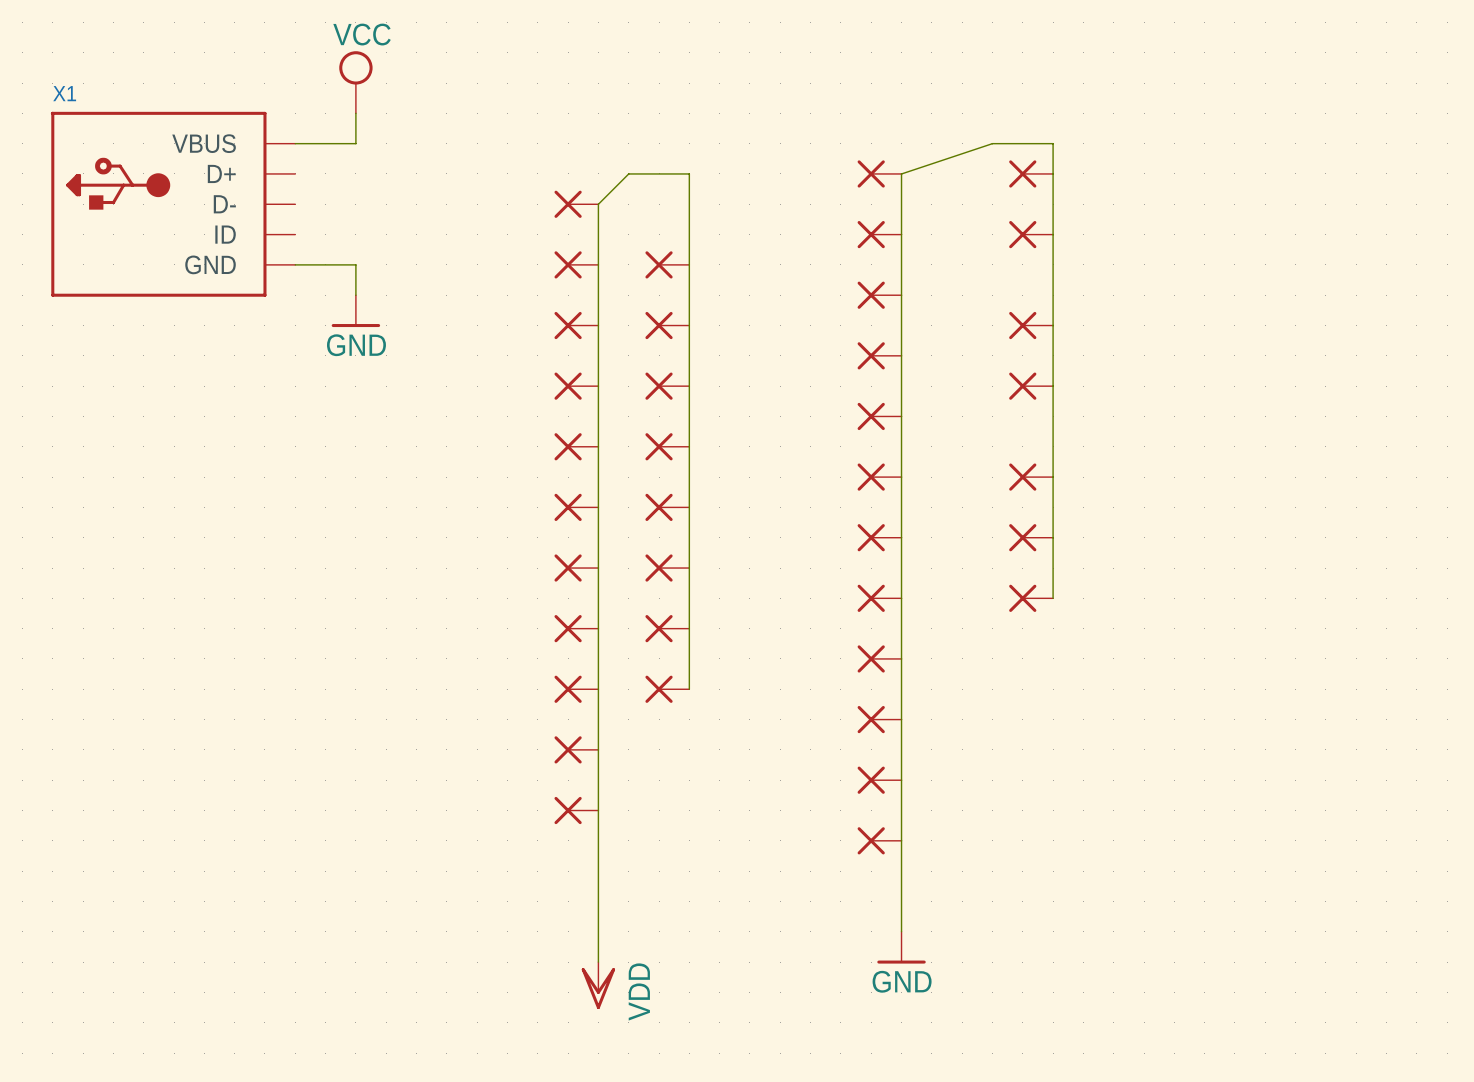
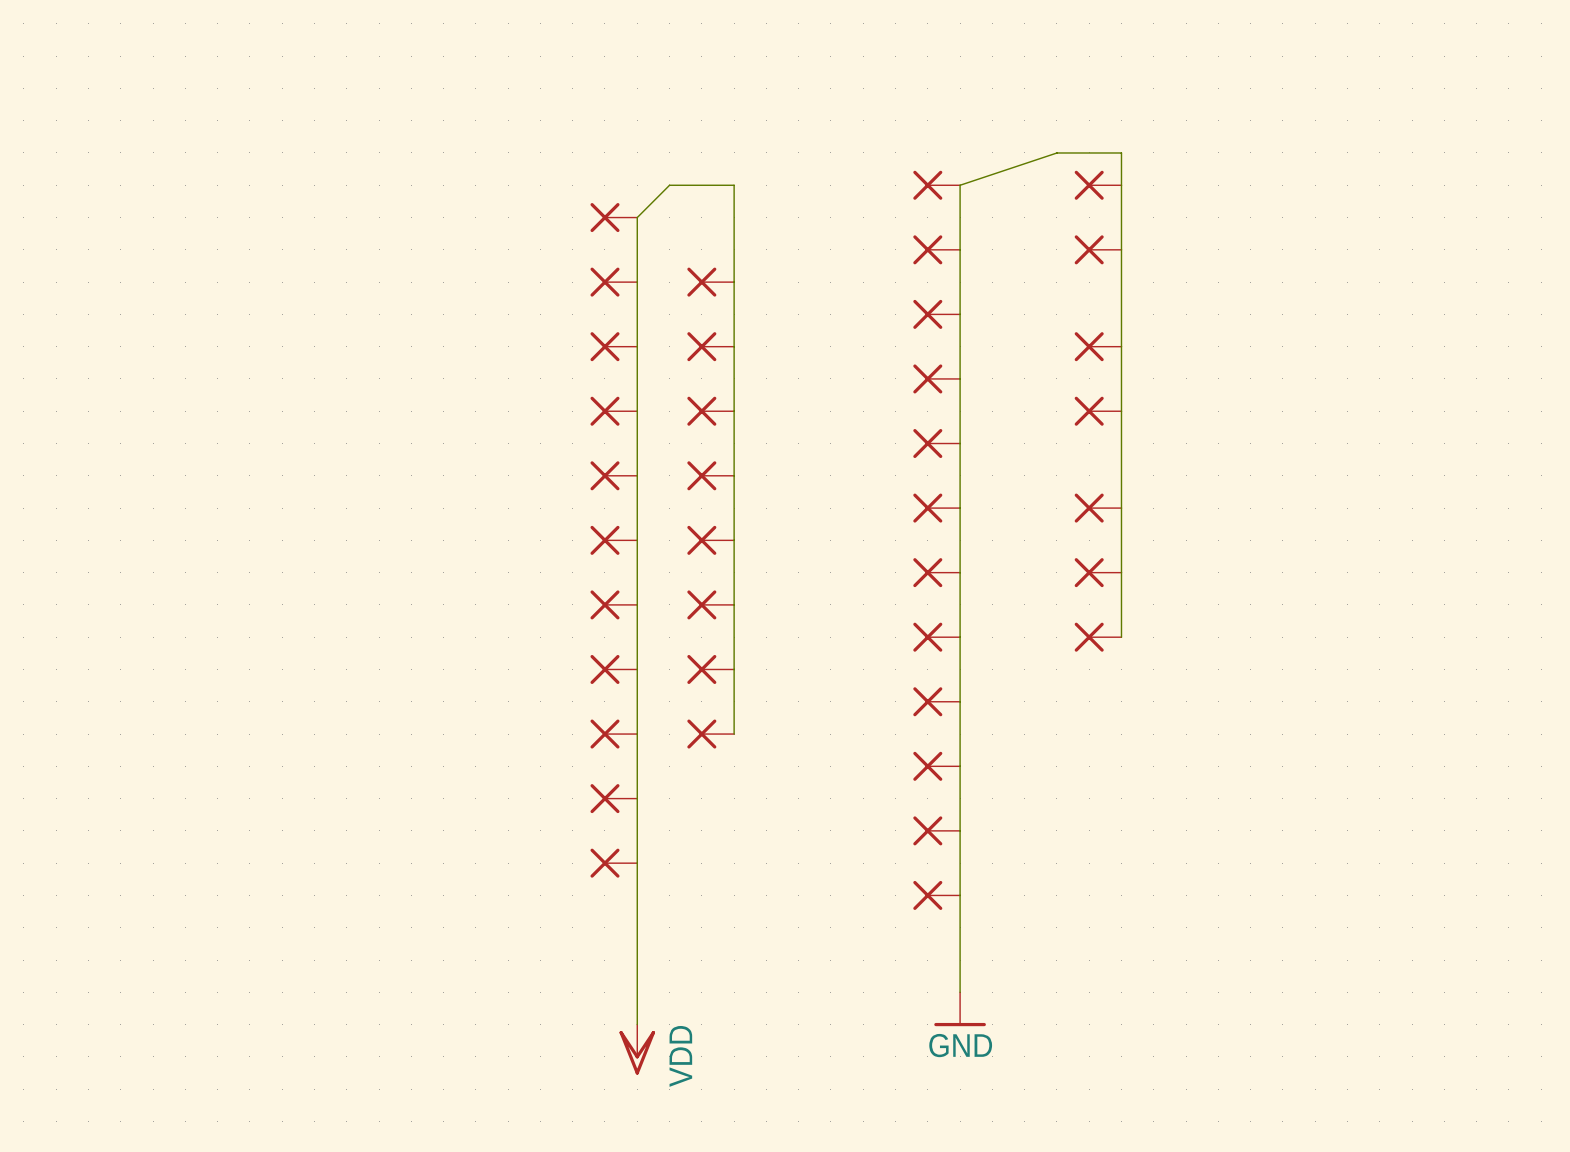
power symbol: VCC (355, 82) -> none
wire: (355, 113) (355, 143) (295, 143) -> none
X1: (173, 204) -> none
wire: (295, 264) (355, 264) (355, 295) -> none
power symbol: GND (355, 311) -> none

